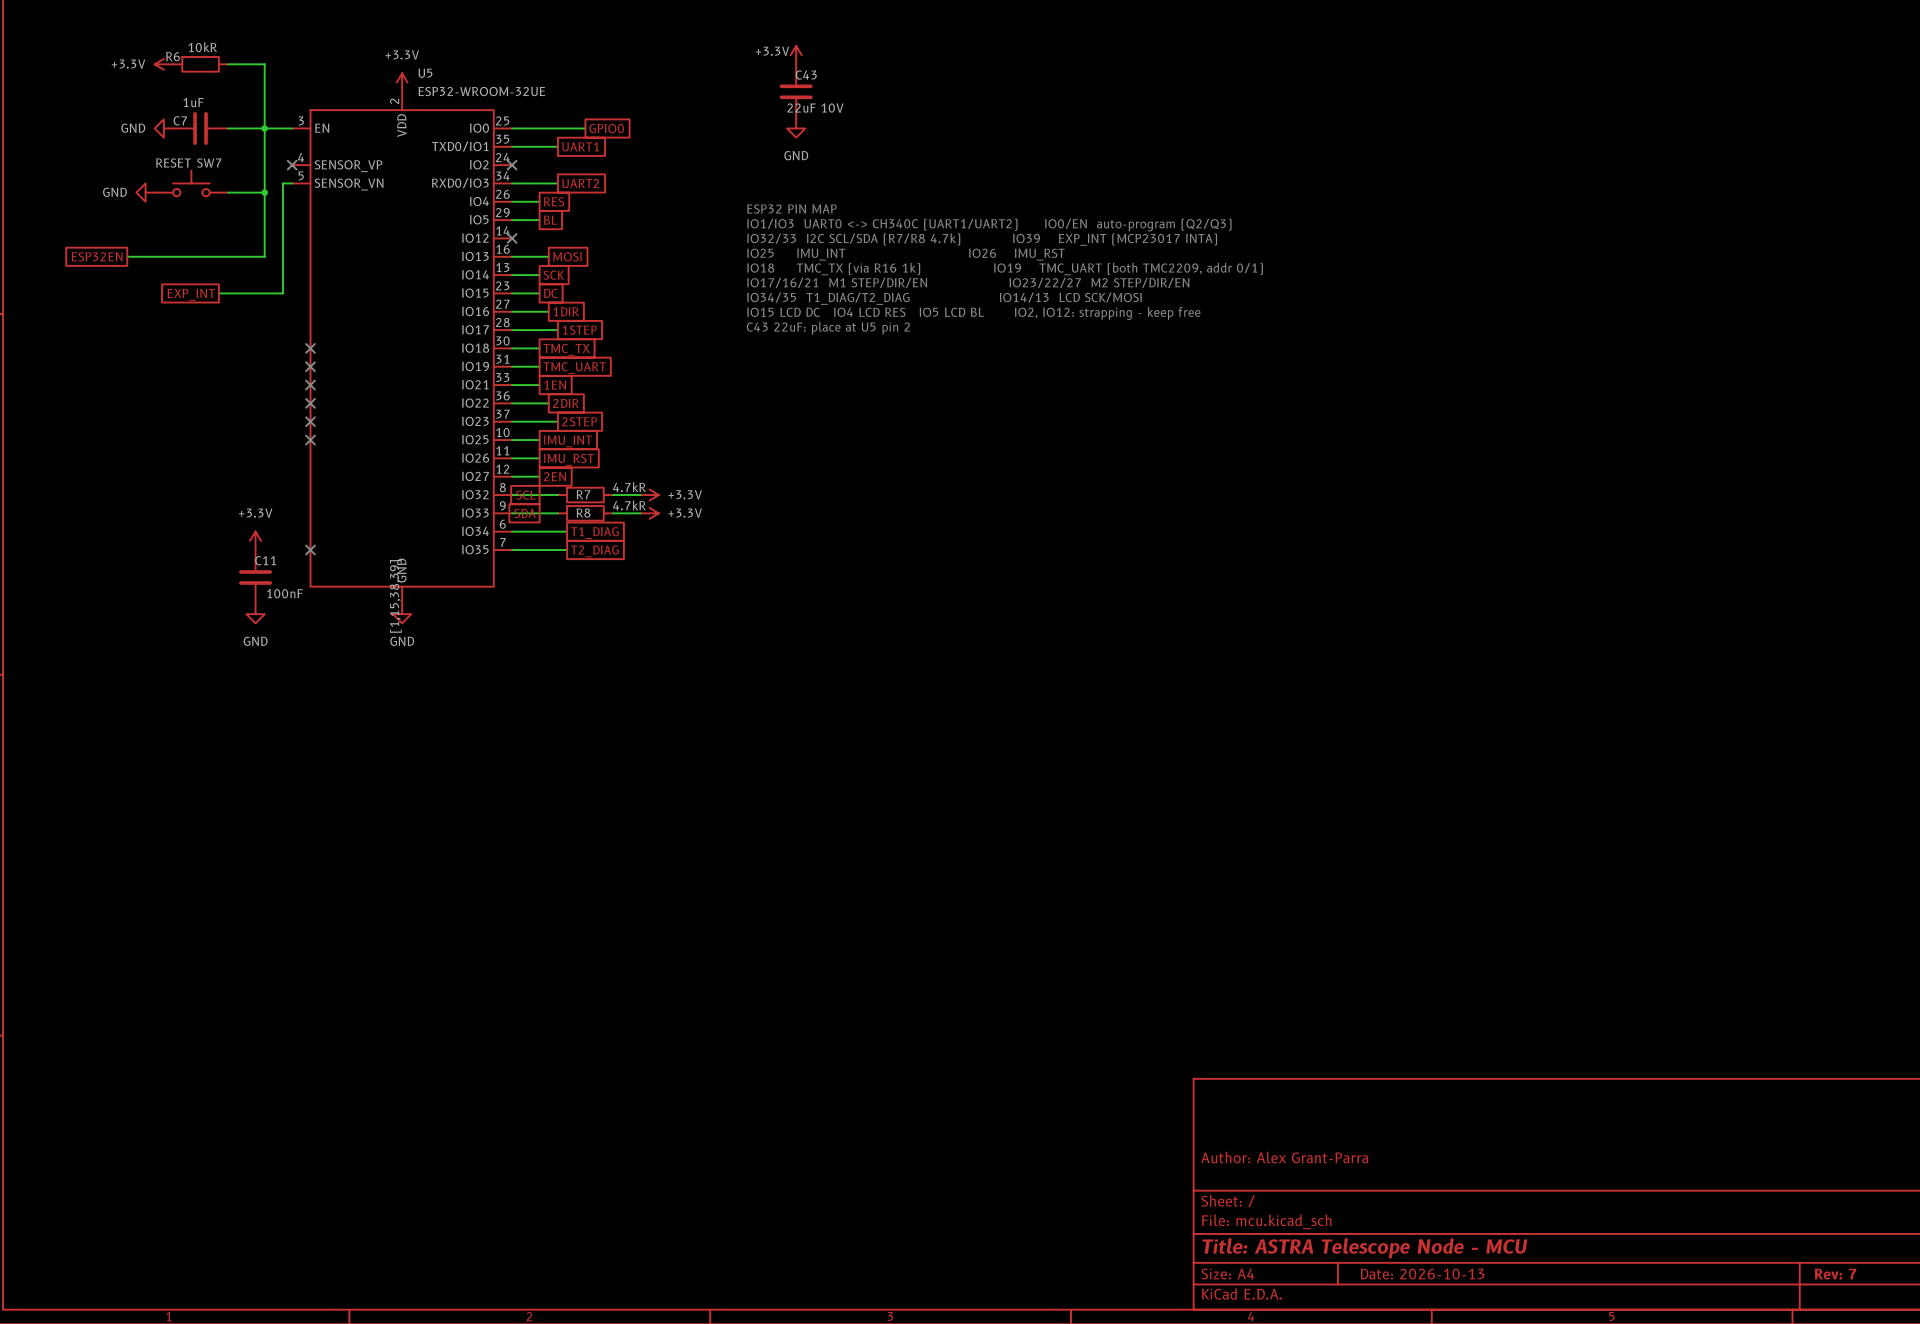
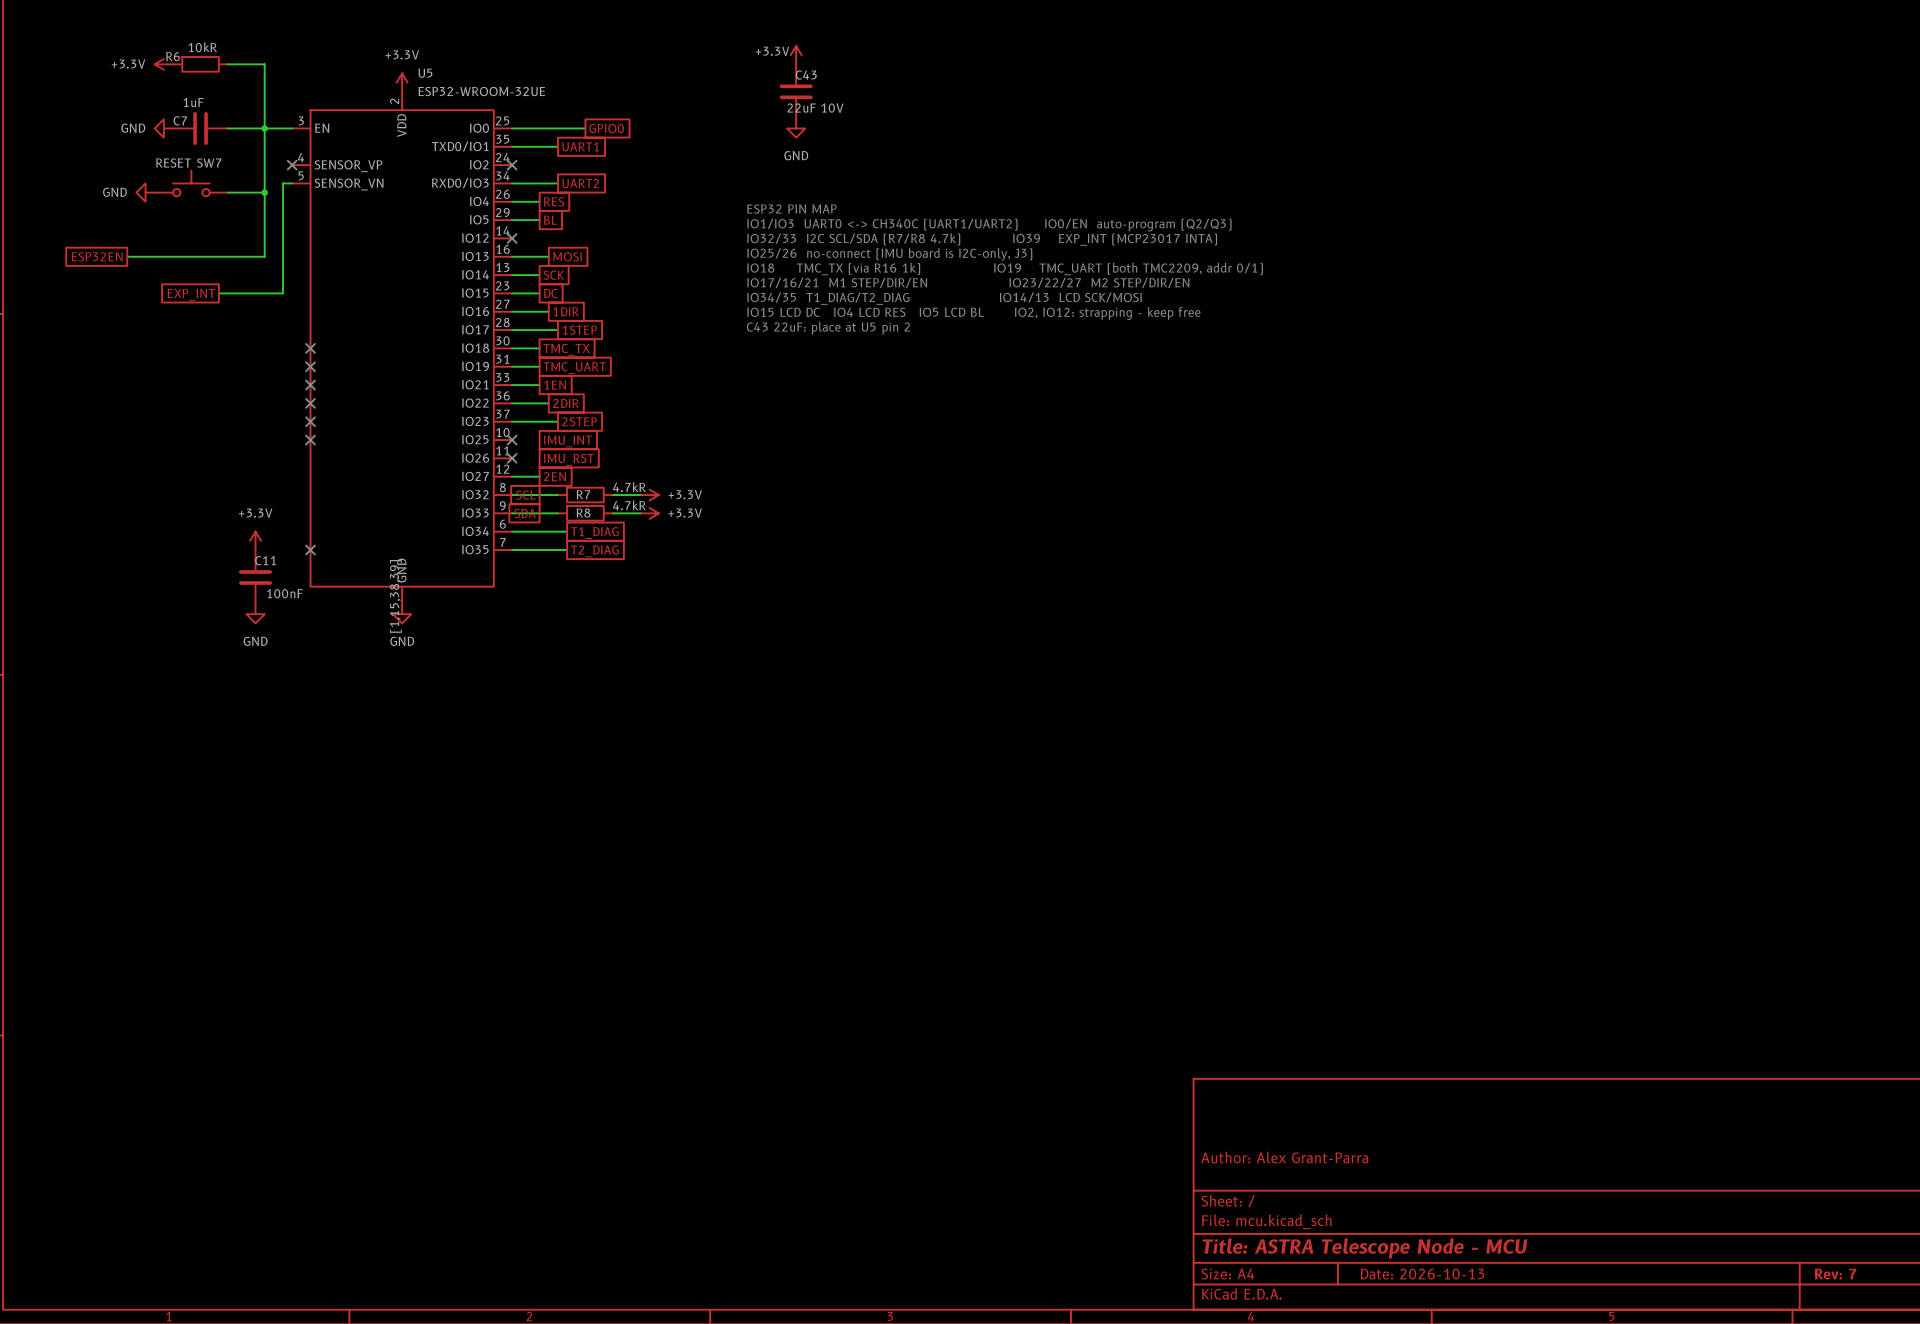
text: IO25 IMU_INT IO26 IMU_RST (905, 254) -> IO25/26 no-connect (IMU board is I2C-only, J3) (889, 254)
wire: (512, 440) (539, 440) -> none
no-connect mark: none -> (512, 440)
wire: (512, 458) (539, 458) -> none
no-connect mark: none -> (512, 458)

